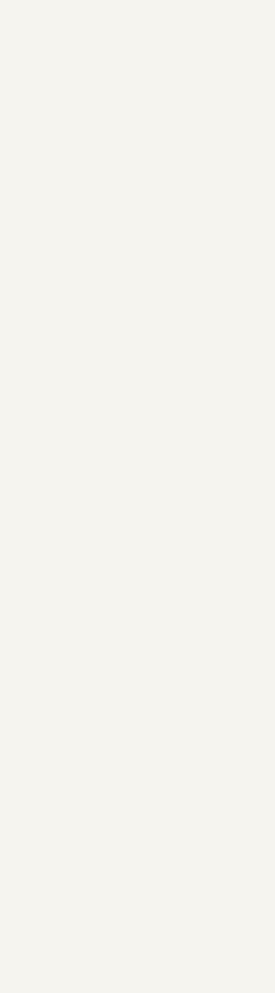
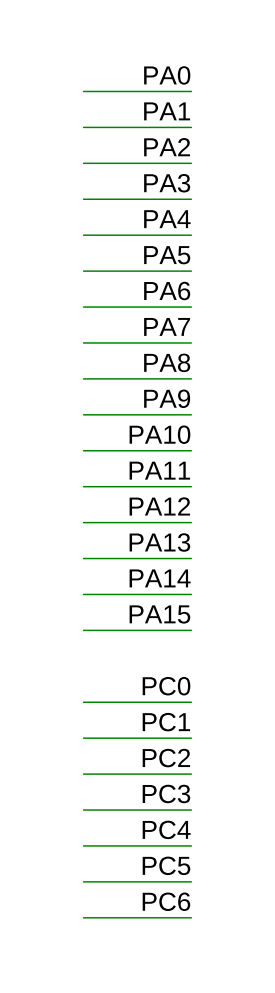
label: none -> PA0 (167, 75)
wire: none -> (83, 91) (191, 91)
label: none -> PA1 (167, 111)
wire: none -> (83, 127) (191, 127)
label: none -> PA2 (167, 147)
wire: none -> (83, 163) (191, 163)
label: none -> PA3 (167, 183)
wire: none -> (83, 199) (191, 199)
label: none -> PA4 (167, 219)
wire: none -> (83, 235) (191, 235)
label: none -> PA5 (167, 255)
wire: none -> (83, 271) (191, 271)
label: none -> PA6 (167, 291)
wire: none -> (83, 307) (191, 307)
label: none -> PA7 (167, 326)
wire: none -> (83, 342) (191, 342)
label: none -> PA8 (167, 362)
wire: none -> (83, 378) (191, 378)
label: none -> PA9 (167, 398)
wire: none -> (83, 414) (191, 414)
label: none -> PA10 (159, 434)
wire: none -> (83, 450) (191, 450)
label: none -> PA11 (159, 470)
wire: none -> (83, 486) (191, 486)
label: none -> PA12 (159, 506)
wire: none -> (83, 522) (191, 522)
label: none -> PA13 (159, 542)
wire: none -> (83, 558) (191, 558)
label: none -> PA14 (160, 578)
wire: none -> (83, 594) (191, 594)
label: none -> PA15 (159, 614)
wire: none -> (83, 630) (191, 630)
label: none -> PC0 (166, 686)
wire: none -> (83, 702) (191, 702)
label: none -> PC1 (166, 722)
wire: none -> (83, 738) (191, 738)
label: none -> PC2 (166, 758)
wire: none -> (83, 774) (191, 774)
label: none -> PC3 (166, 793)
wire: none -> (83, 810) (191, 810)
label: none -> PC4 (166, 829)
wire: none -> (83, 845) (191, 845)
label: none -> PC5 (166, 865)
wire: none -> (83, 881) (191, 881)
label: none -> PC6 (166, 901)
wire: none -> (83, 917) (191, 917)

